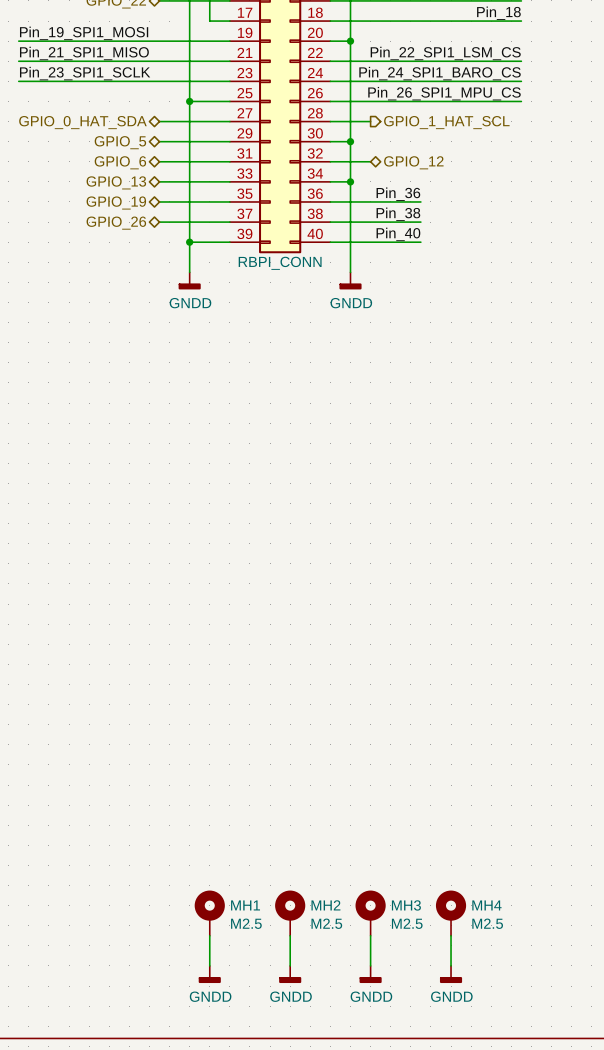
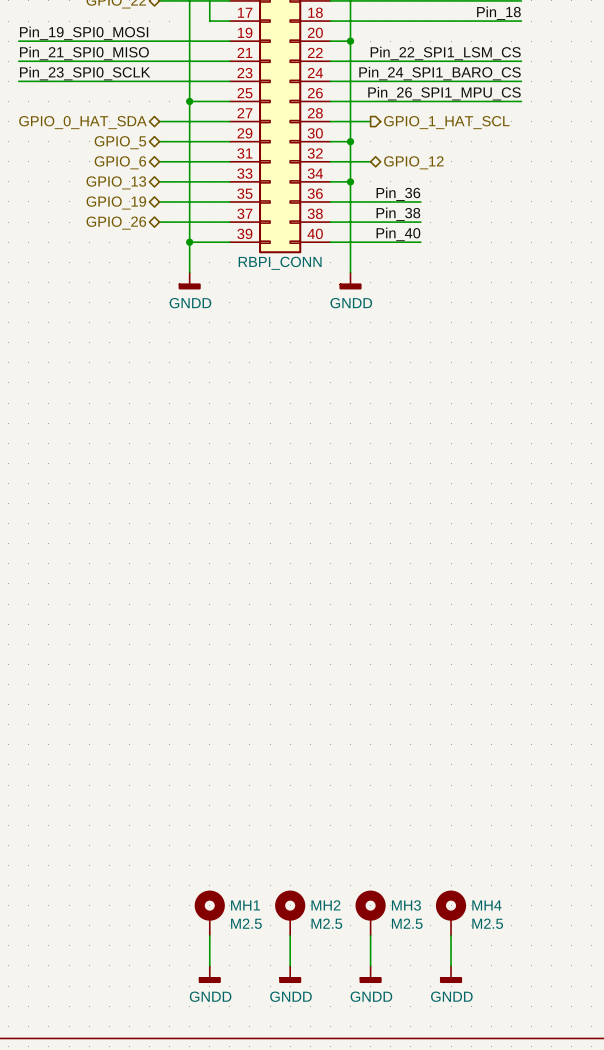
label: Pin_19_SPI1_MOSI (84, 33) -> Pin_19_SPI0_MOSI (84, 33)
label: Pin_21_SPI1_MISO (84, 53) -> Pin_21_SPI0_MISO (84, 53)
label: Pin_23_SPI1_SCLK (85, 73) -> Pin_23_SPI0_SCLK (85, 73)

